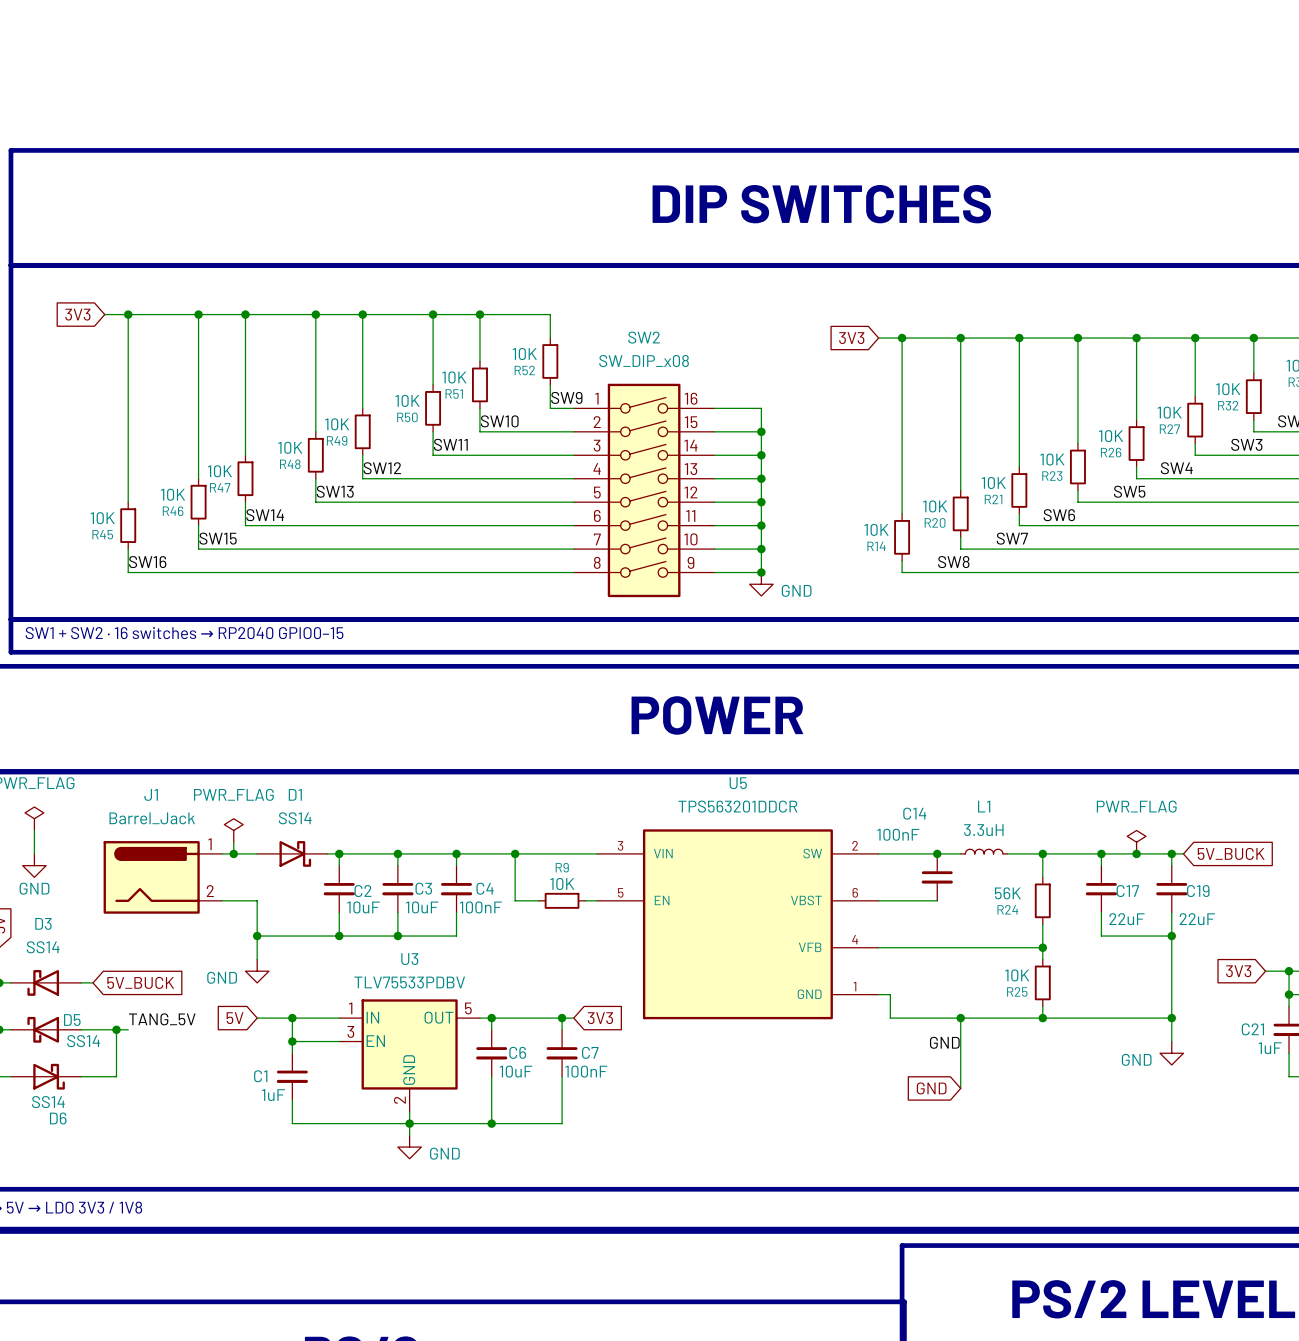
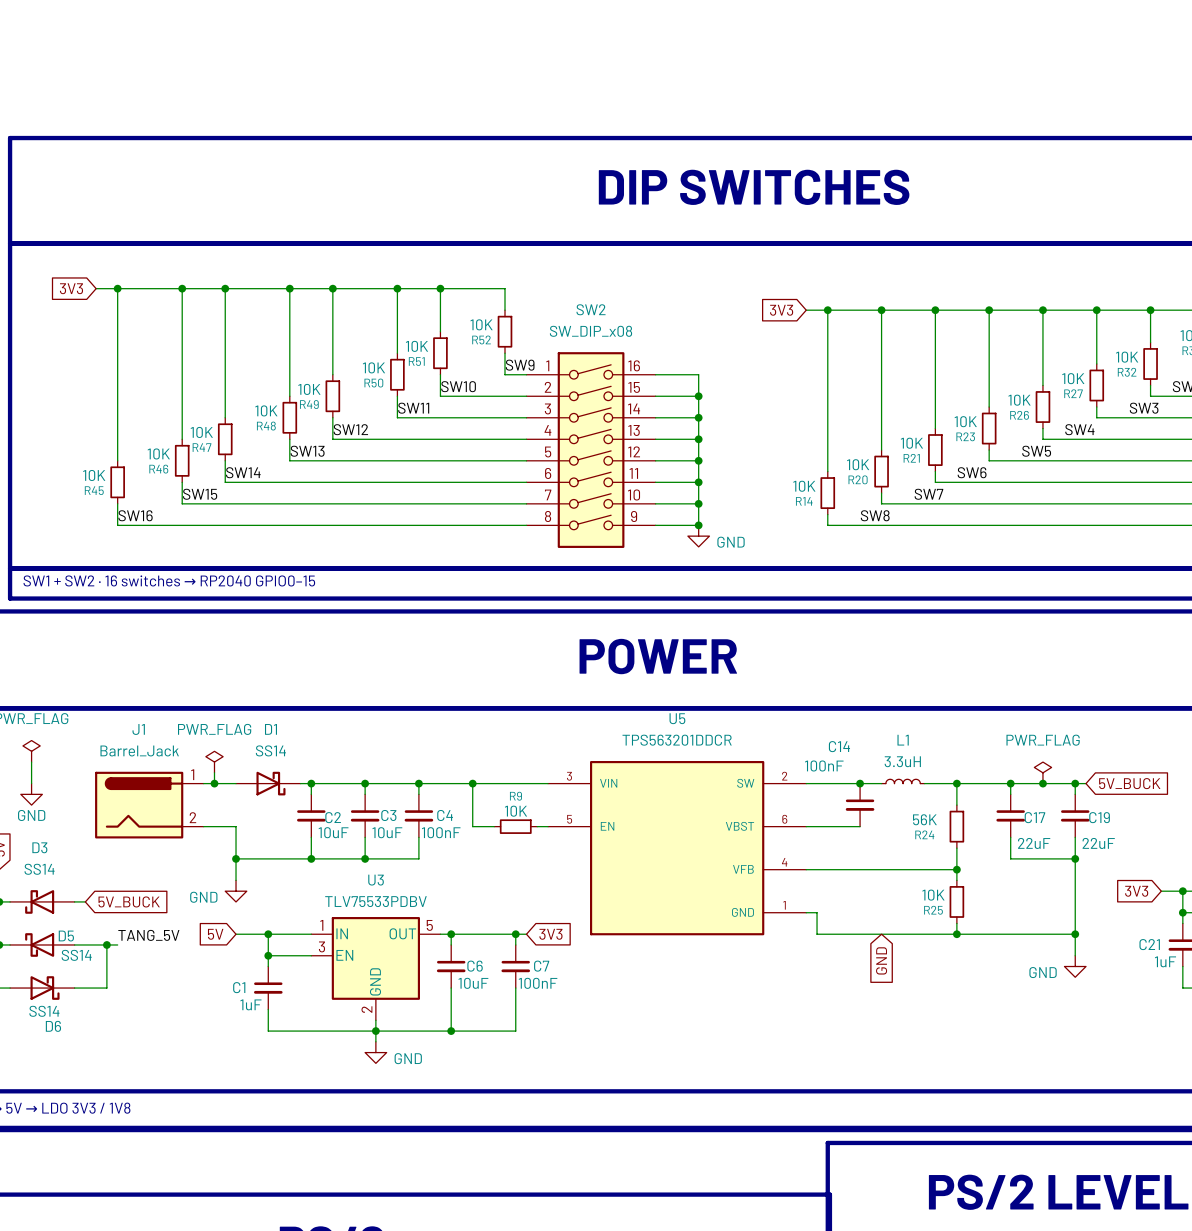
wire: (960, 1018) (960, 1088) -> none
junction: (960, 1018) -> none
label: GND (944, 1042) -> none
global label rotation: 0° (931, 1088) -> 90° counterclockwise (881, 960)

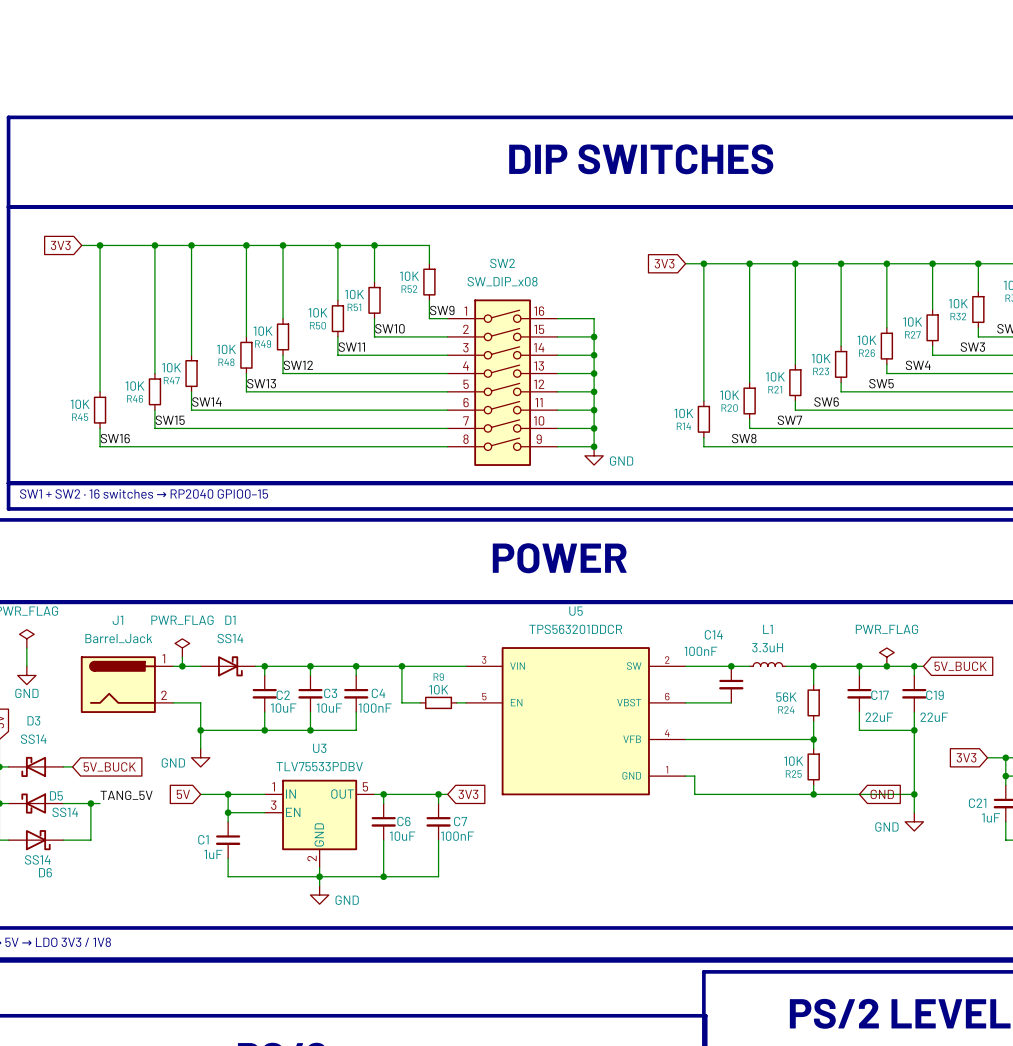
global label rotation: 0° (881, 960) -> 90° counterclockwise (882, 794)
global label position: GND (881, 960) -> GND (882, 794)

